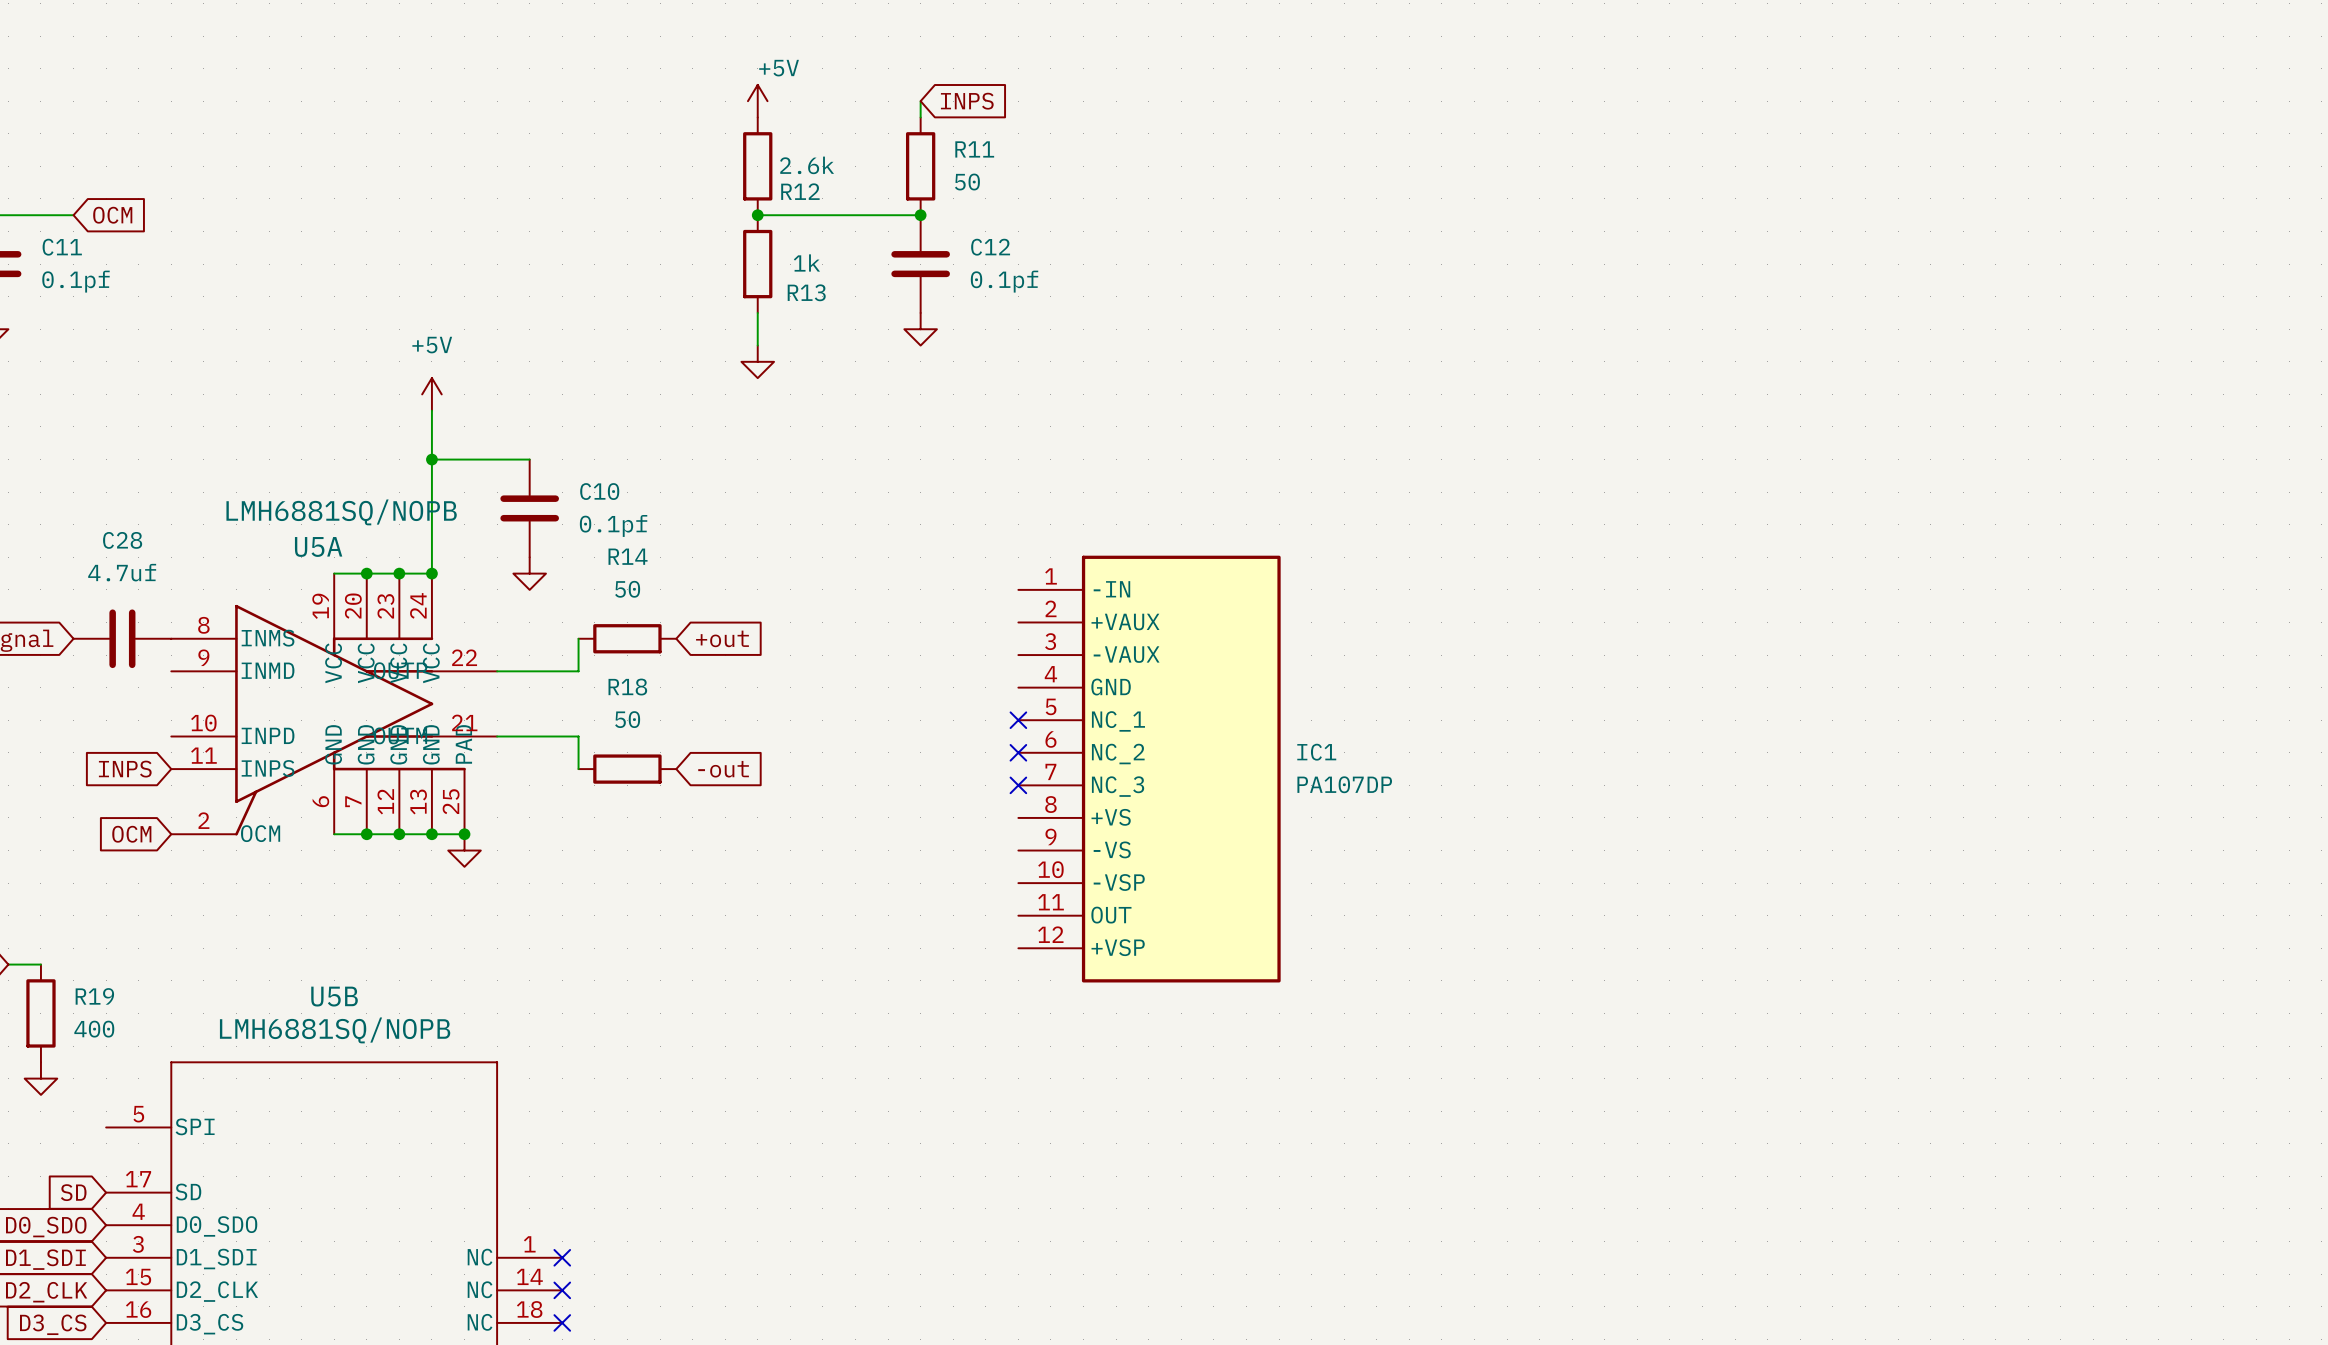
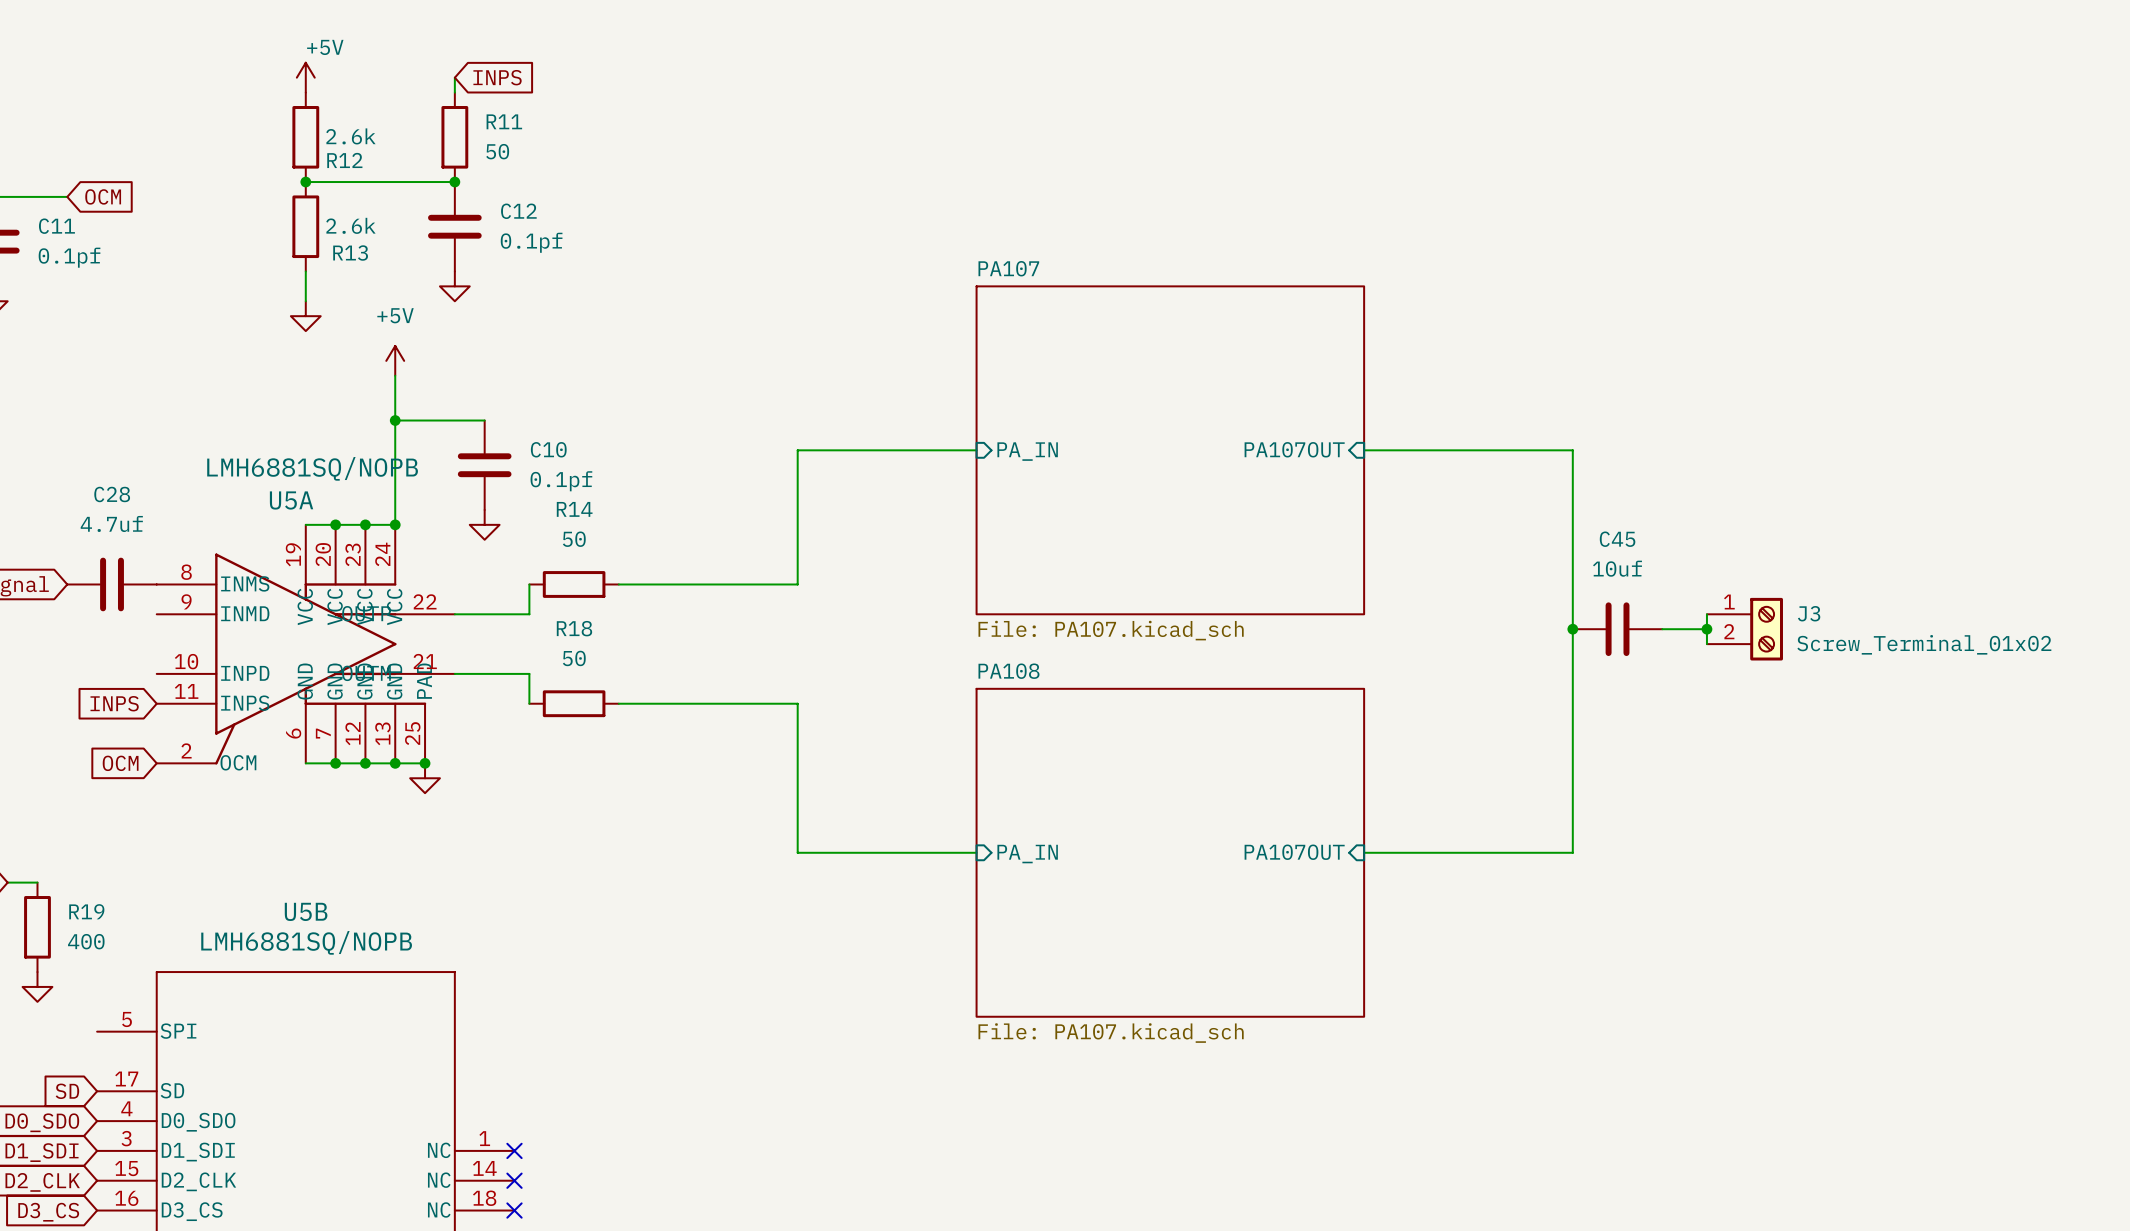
power symbol: none -> +5V (305, 77)
wire: none -> (454, 77) (454, 92)
global label: none -> INPS (497, 77)
power symbol: +5V (757, 101) -> none
wire: (920, 101) (920, 117) -> none
global label: INPS (967, 101) -> none
R12 position: (757, 166) -> (305, 137)
R11 position: (920, 166) -> (454, 137)
wire: none -> (305, 182) (454, 182)
junction: none -> (305, 182)
junction: none -> (454, 182)
wire: (757, 215) (920, 215) -> none
junction: (757, 215) -> none
junction: (920, 215) -> none
R13 value: 1k (806, 262) -> 2.6k (350, 225)
R13 position: (757, 264) -> (305, 226)
C12 position: (920, 264) -> (454, 226)
wire: none -> (305, 271) (305, 301)
power symbol: none -> (454, 286)
wire: (757, 312) (757, 345) -> none
power symbol: (920, 329) -> none
power symbol: none -> (305, 316)
power symbol: (757, 361) -> none
sheet pin: none -> PA107OUT (1294, 449)
wire: none -> (976, 450) (797, 450) (797, 584) (618, 584)
sheet PA107: none -> File: PA107.kicad_sch (1170, 450)
wire: none -> (1364, 450) (1572, 450) (1572, 852) (1364, 852)
sheet pin: none -> PA_IN (1027, 451)
global label: +out (722, 638) -> none
wire: none -> (1706, 614) (1706, 644)
junction: none -> (1572, 629)
C45: none -> 10uf (1617, 629)
wire: none -> (1662, 629) (1706, 629)
junction: none -> (1706, 629)
J3: none -> Screw_Terminal_01x02 (1744, 629)
no-connect mark: (1018, 720) -> none
no-connect mark: (1018, 752) -> none
wire: none -> (618, 703) (797, 703) (797, 852) (976, 852)
global label: -out (723, 769) -> none
IC1: PA107DP (1149, 769) -> none
no-connect mark: (1018, 785) -> none
sheet PA108: none -> File: PA107.kicad_sch (1170, 852)
sheet pin: none -> PA107OUT (1294, 852)
sheet pin: none -> PA_IN (1027, 854)

